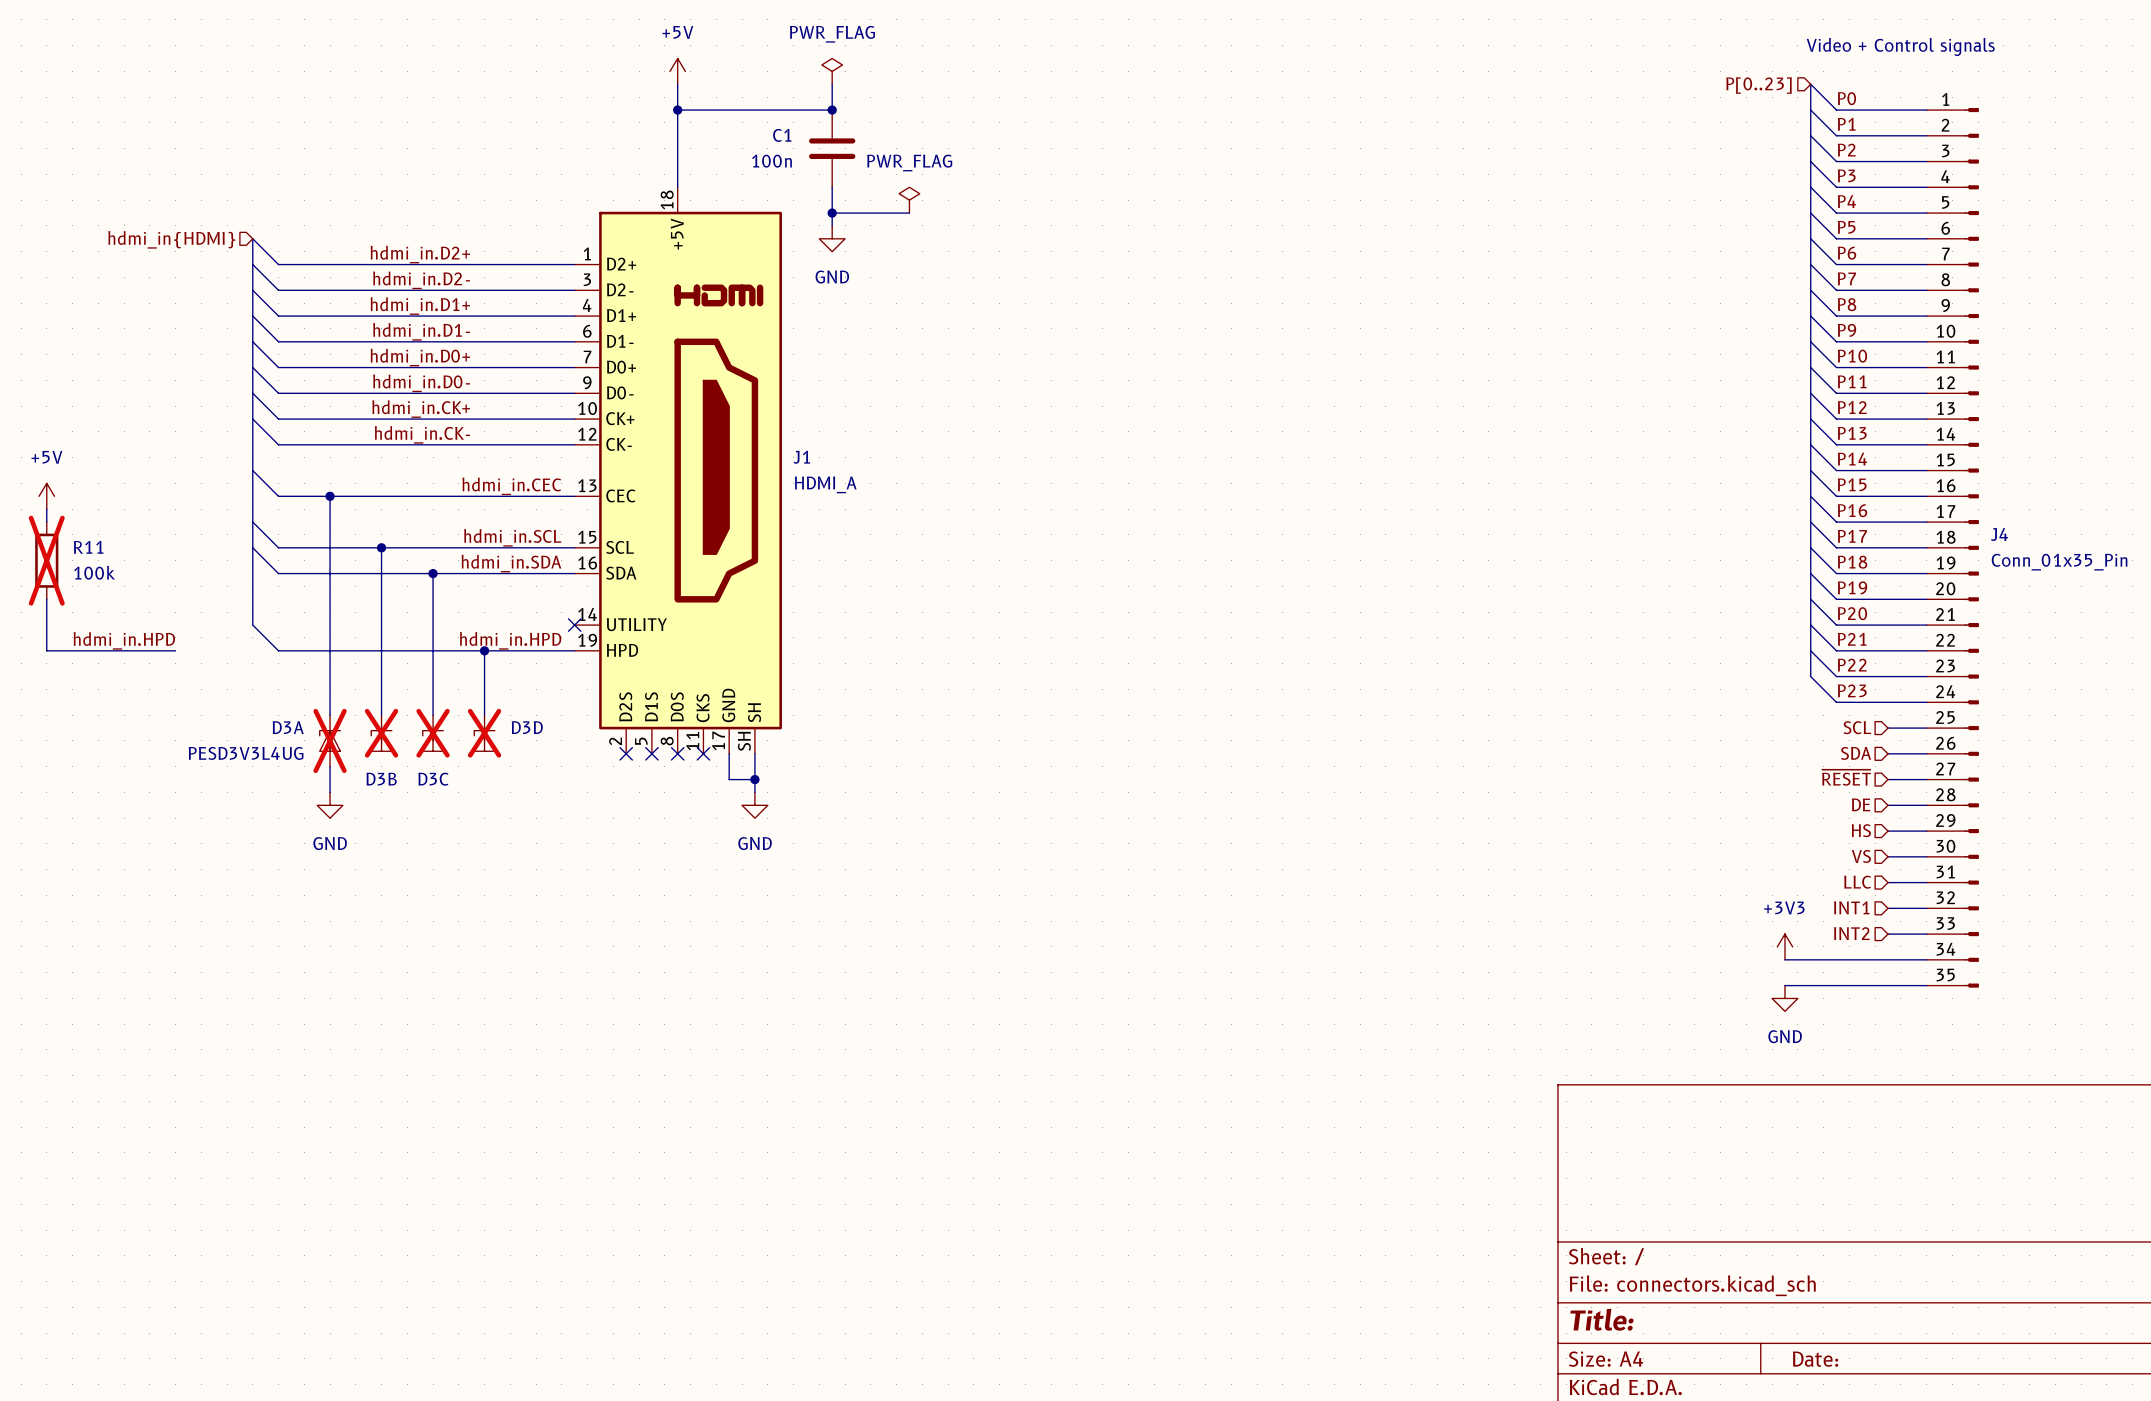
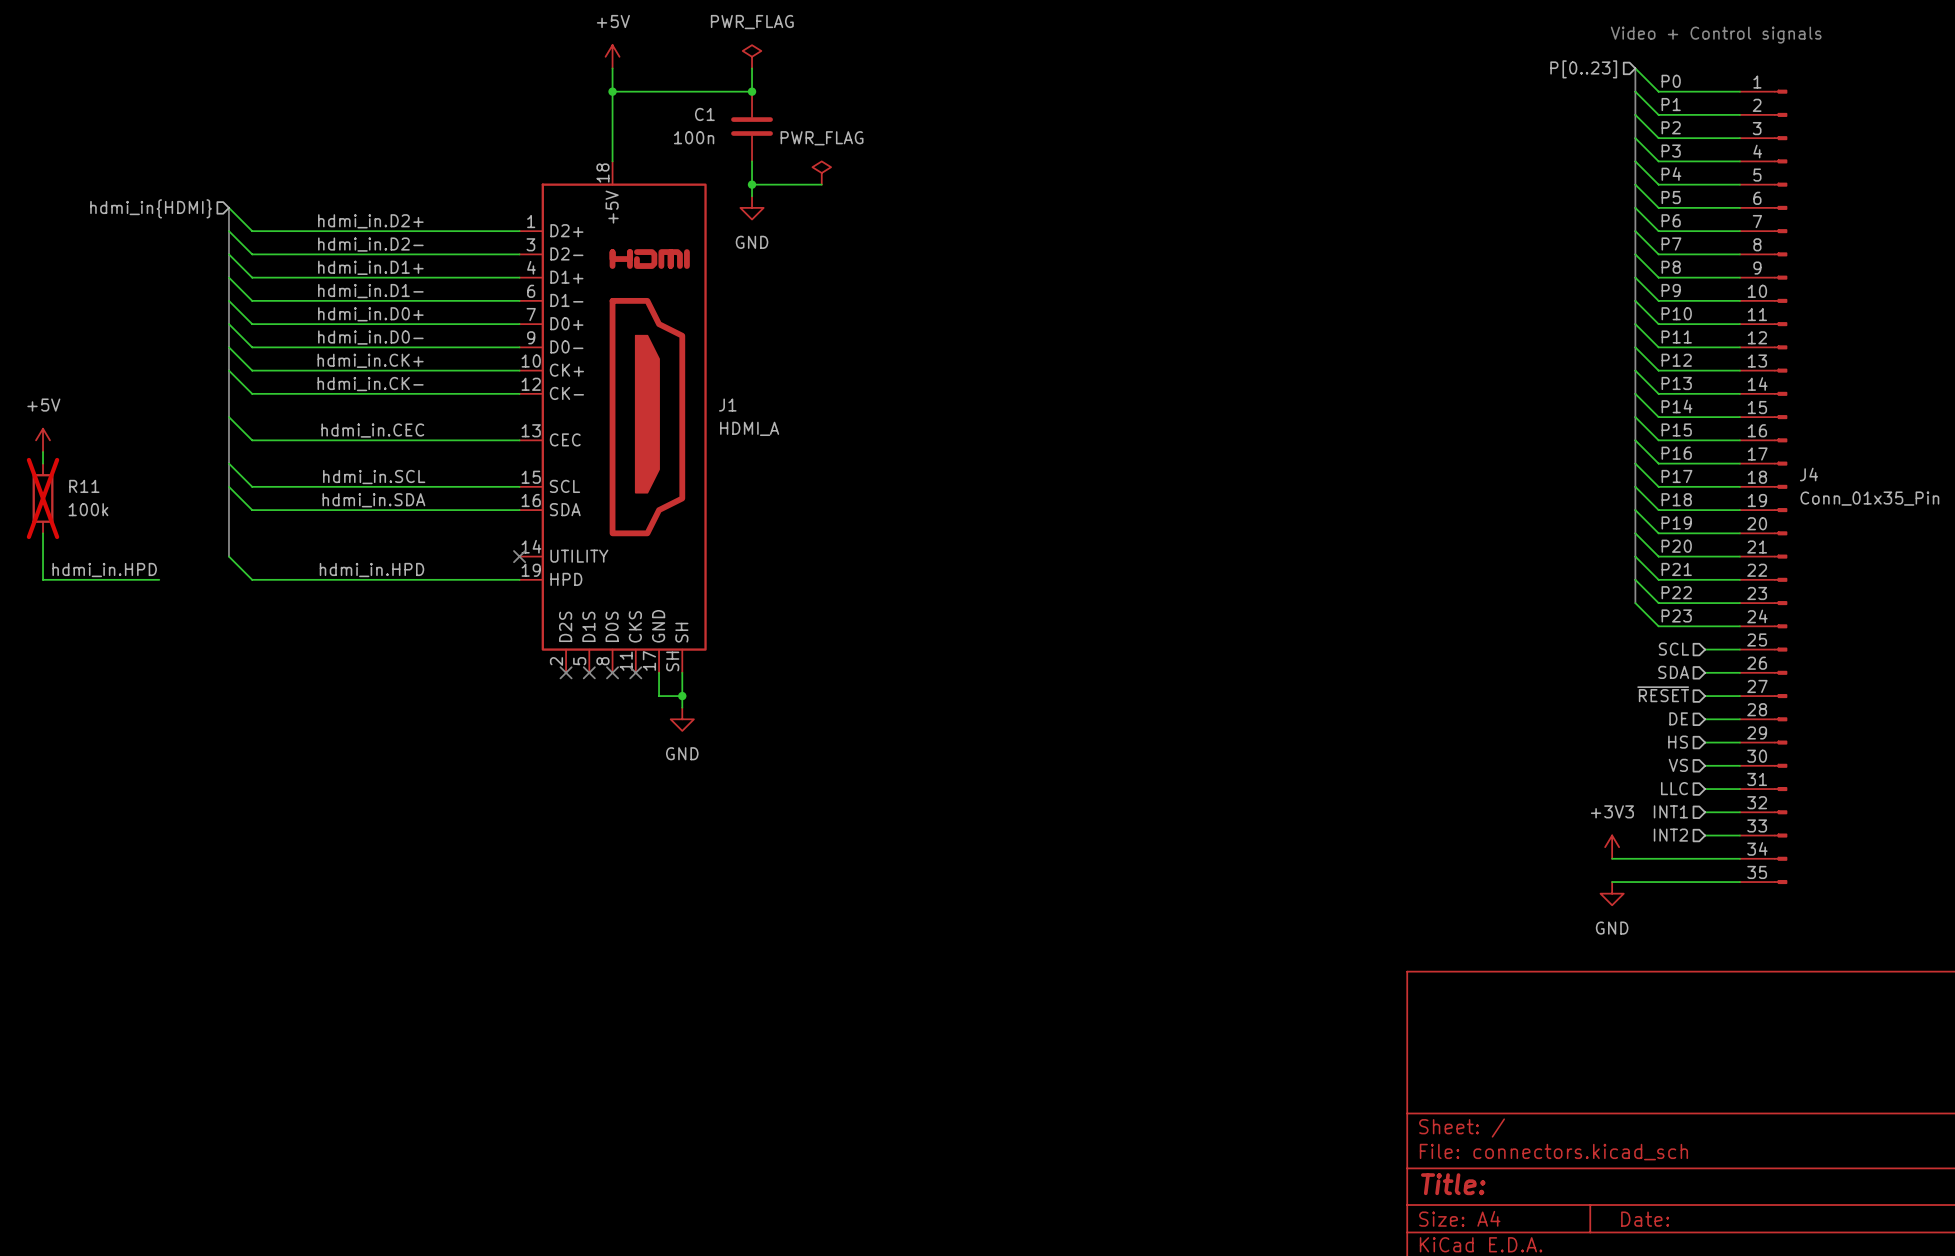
label position: hdmi_in.CEC (511, 486) -> hdmi_in.CEC (372, 430)
wire: (330, 496) (330, 715) -> none
junction: (330, 496) -> none
label position: hdmi_in.SCL (512, 537) -> hdmi_in.SCL (374, 477)
wire: (381, 547) (381, 715) -> none
junction: (381, 547) -> none
label position: hdmi_in.SDA (511, 563) -> hdmi_in.SDA (373, 500)
wire: (433, 573) (433, 715) -> none
junction: (433, 573) -> none
label position: hdmi_in.HPD (510, 640) -> hdmi_in.HPD (371, 570)
wire: (484, 650) (484, 715) -> none
junction: (484, 650) -> none
D3B: (381, 733) -> none
D3C: (433, 733) -> none
D3D: (484, 733) -> none
D3A: PESD3V3L4UG (330, 740) -> none
wire: (330, 766) (330, 792) -> none
power symbol: GND (330, 805) -> none

